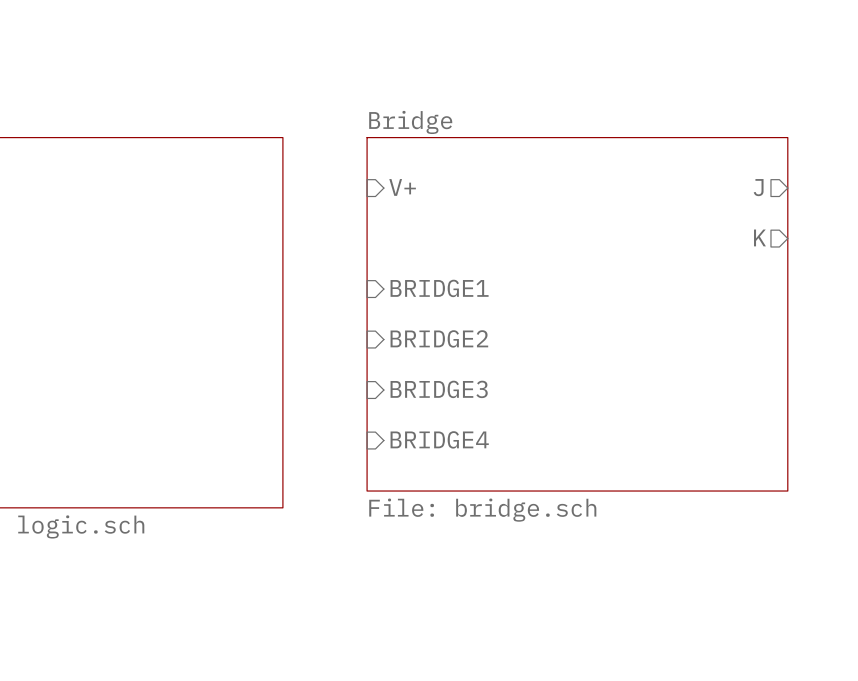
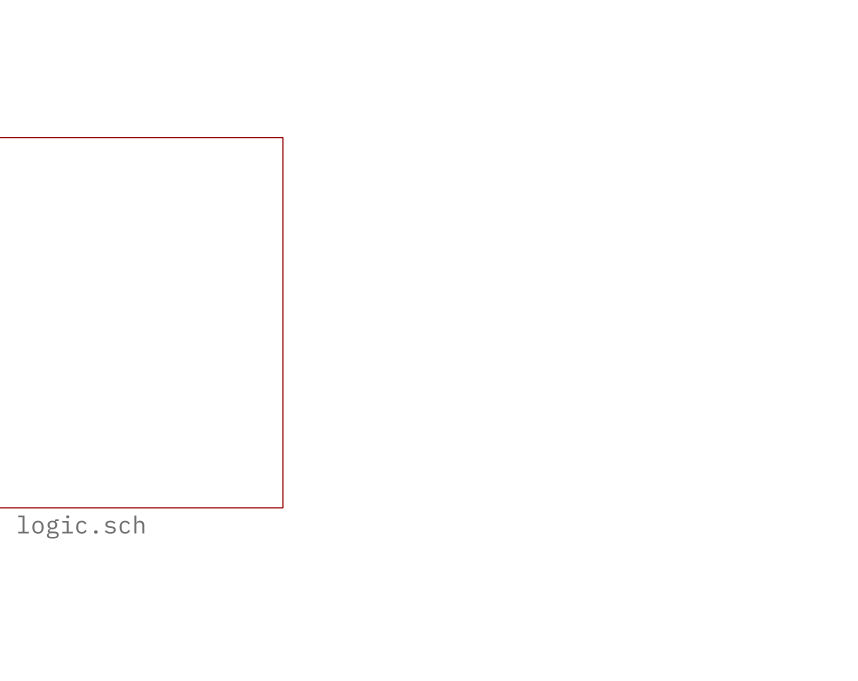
sheet pin: V+ (402, 187) -> none
sheet pin: J (758, 187) -> none
sheet pin: K (759, 237) -> none
sheet pin: BRIDGE1 (439, 288) -> none
sheet Bridge: File: bridge.sch (577, 314) -> none
sheet pin: BRIDGE2 (439, 338) -> none
sheet pin: BRIDGE3 (439, 389) -> none
sheet pin: BRIDGE4 (439, 439) -> none

